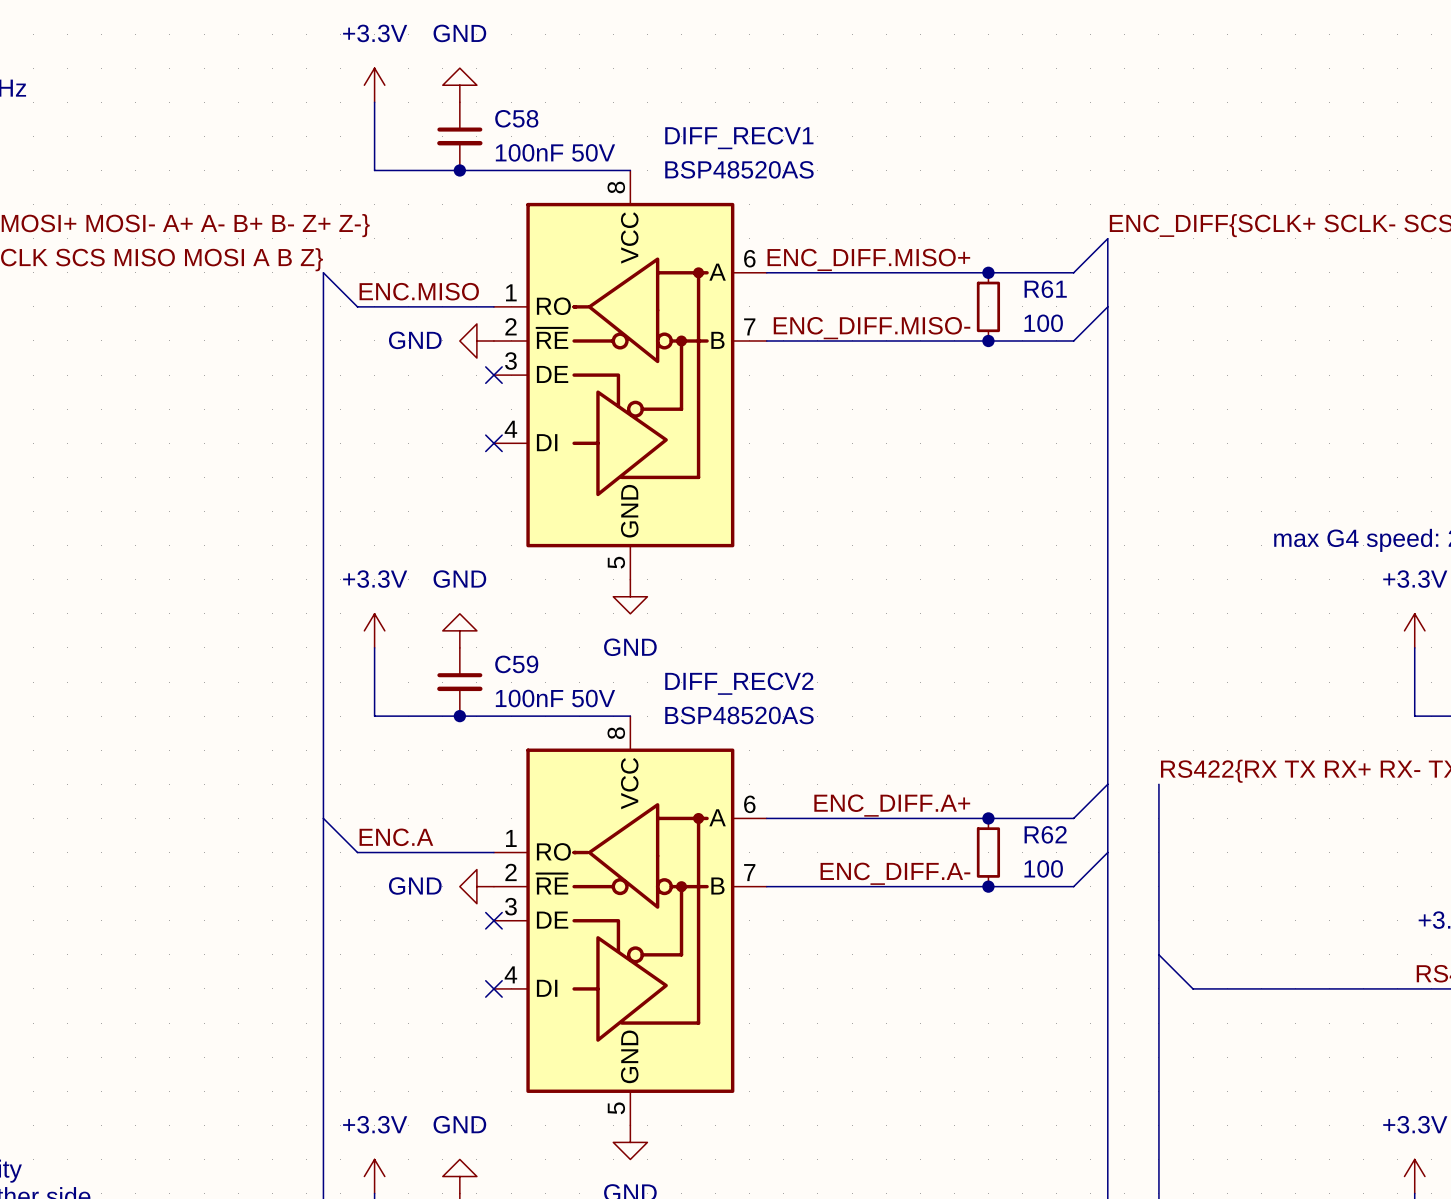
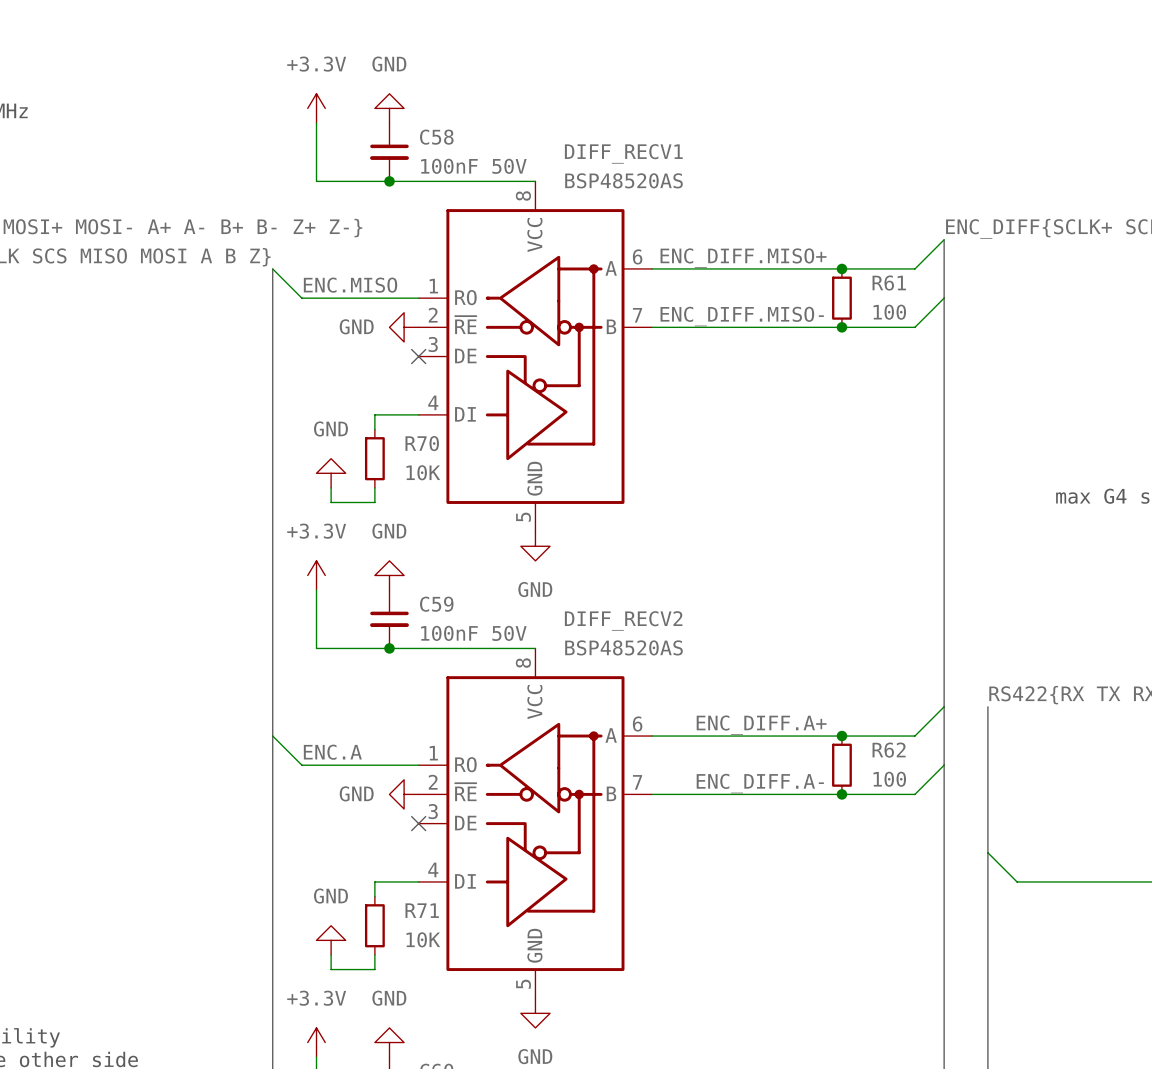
wire: none -> (418, 414) (374, 414) (374, 429)
no-connect mark: (493, 443) -> none
R70: none -> 10K (374, 458)
power symbol: none -> GND (331, 473)
wire: none -> (331, 487) (331, 502) (374, 502) (374, 487)
wire: none -> (418, 881) (374, 881) (374, 896)
no-connect mark: (493, 988) -> none
R71: none -> 10K (374, 925)
power symbol: none -> GND (331, 940)
wire: none -> (331, 954) (331, 969) (374, 969) (374, 954)

